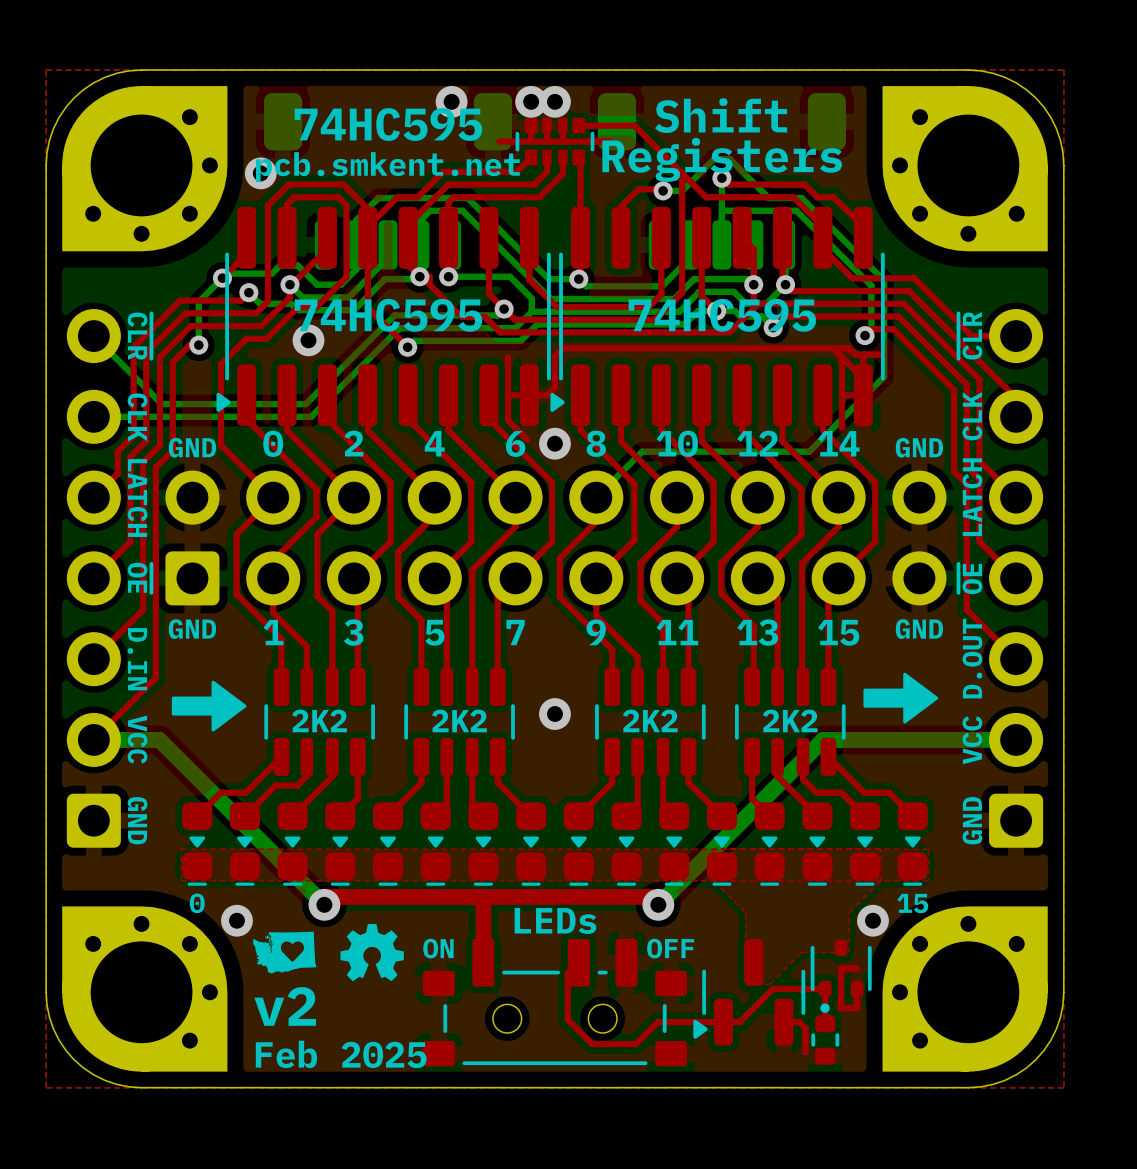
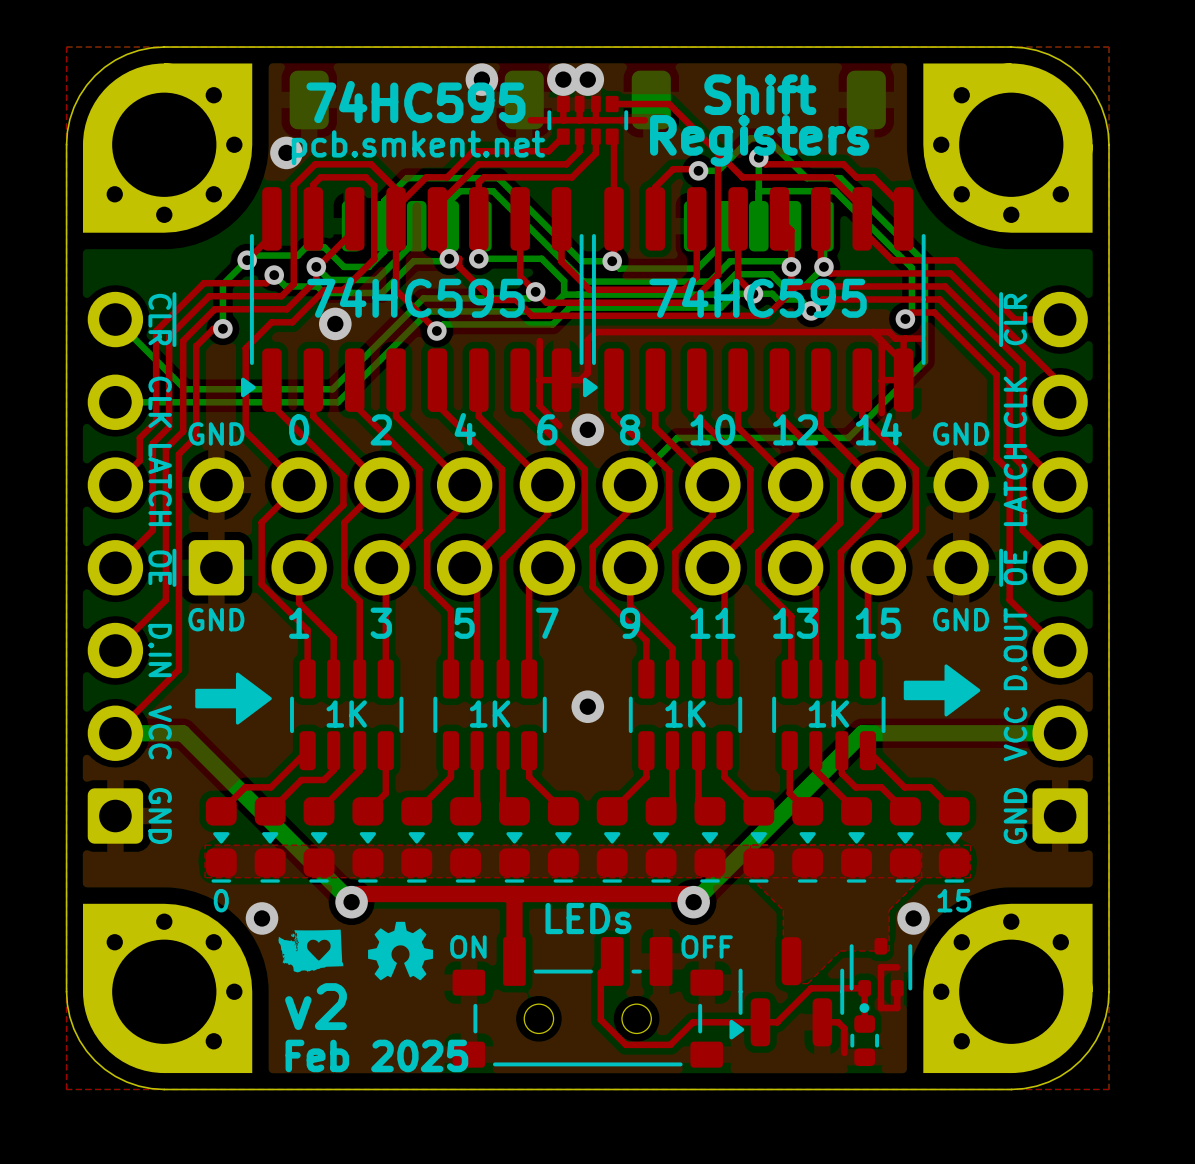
part value: 2K2 (319, 720) -> 1K (346, 714)
part value: 2K2 (459, 720) -> 1K (490, 714)
part value: 2K2 (650, 720) -> 1K (685, 714)
part value: 2K2 (790, 720) -> 1K (828, 714)

